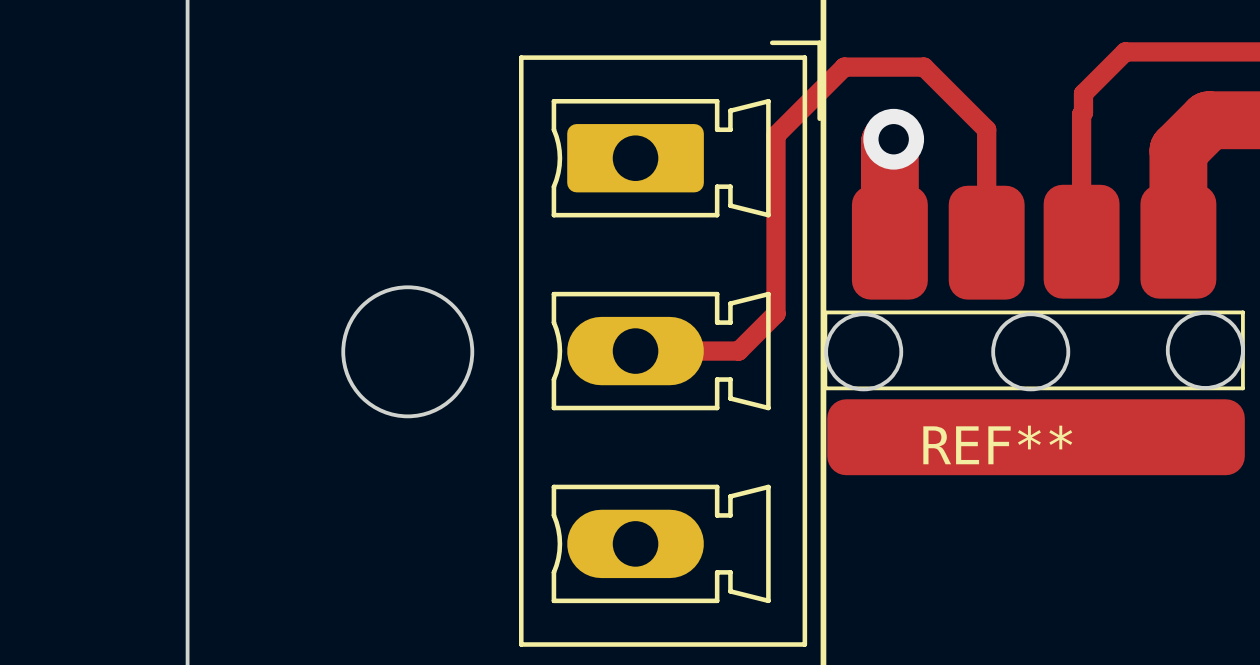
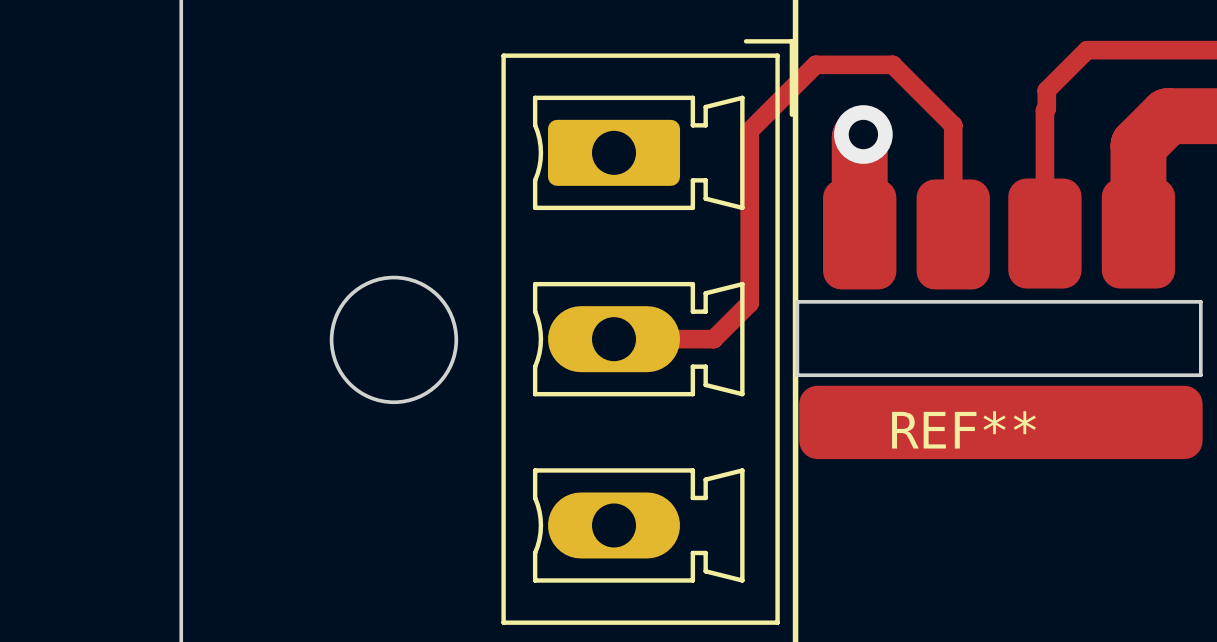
round board edge: [1165, 310, 1245, 390] -> none
round board edge: [824, 312, 904, 392] -> none
line: (825, 312) (1242, 312) (1242, 388) (825, 388) (825, 312) -> none
board edge: none -> (797, 301) (1200, 301) (1200, 375) (797, 375) (797, 301)
round board edge: [991, 312, 1071, 392] -> none

